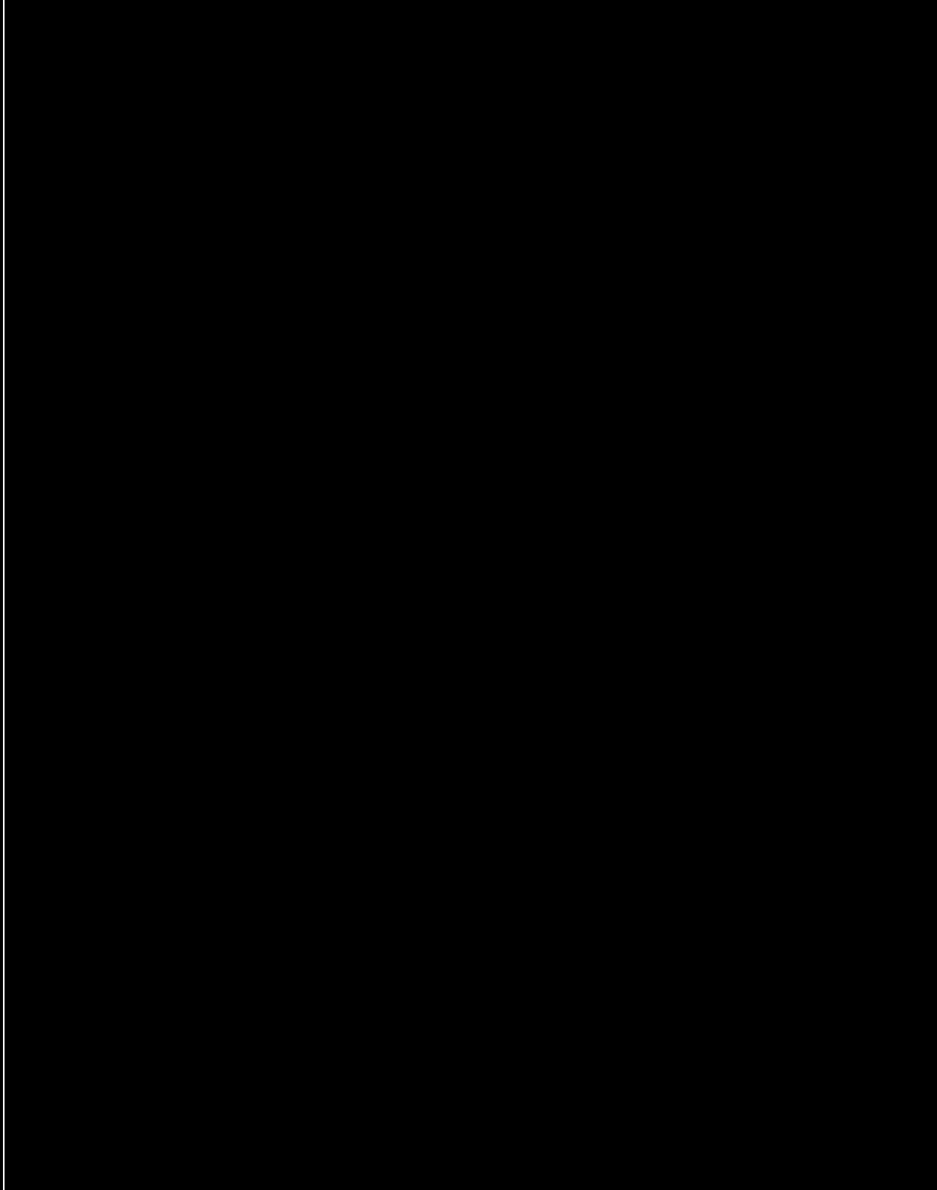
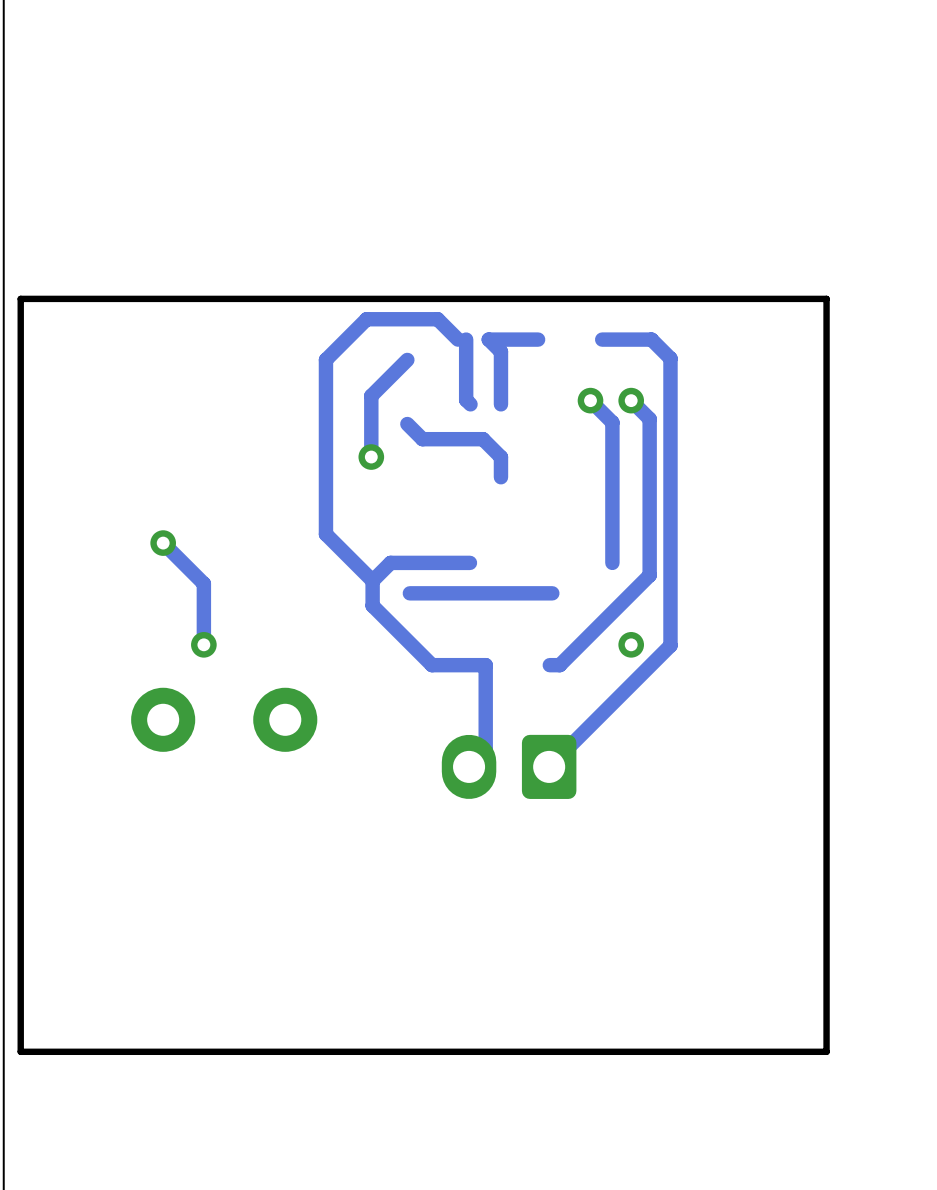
board edge: none -> (826, 298) (20, 298) (20, 1051) (826, 1051) (826, 298)
track: none -> (457, 339) (437, 319) (366, 319) (325, 359) (325, 534) (372, 580)
track: none -> (466, 339) (466, 399) (470, 404)
track: none -> (538, 339) (488, 339) (500, 351) (500, 404)
track: none -> (602, 339) (651, 339) (670, 358) (670, 645) (549, 766)
track: none -> (407, 359) (371, 395) (371, 457)
track: none -> (590, 400) (612, 422) (612, 562)
via: none -> (590, 400)
track: none -> (631, 400) (649, 419) (649, 575) (559, 665) (549, 665)
via: none -> (631, 400)
track: none -> (407, 424) (422, 439) (482, 439) (500, 457) (500, 477)
via: none -> (371, 457)
track: none -> (163, 543) (203, 583) (203, 644)
via: none -> (163, 543)
track: none -> (469, 562) (390, 562) (372, 580)
track: none -> (372, 580) (372, 605) (432, 665) (485, 665) (485, 750) (469, 766)
track: none -> (552, 593) (409, 593)
via: none -> (203, 644)
via: none -> (631, 644)
part: none -> (163, 719)
part: none -> (285, 719)
part: none -> (509, 766)

